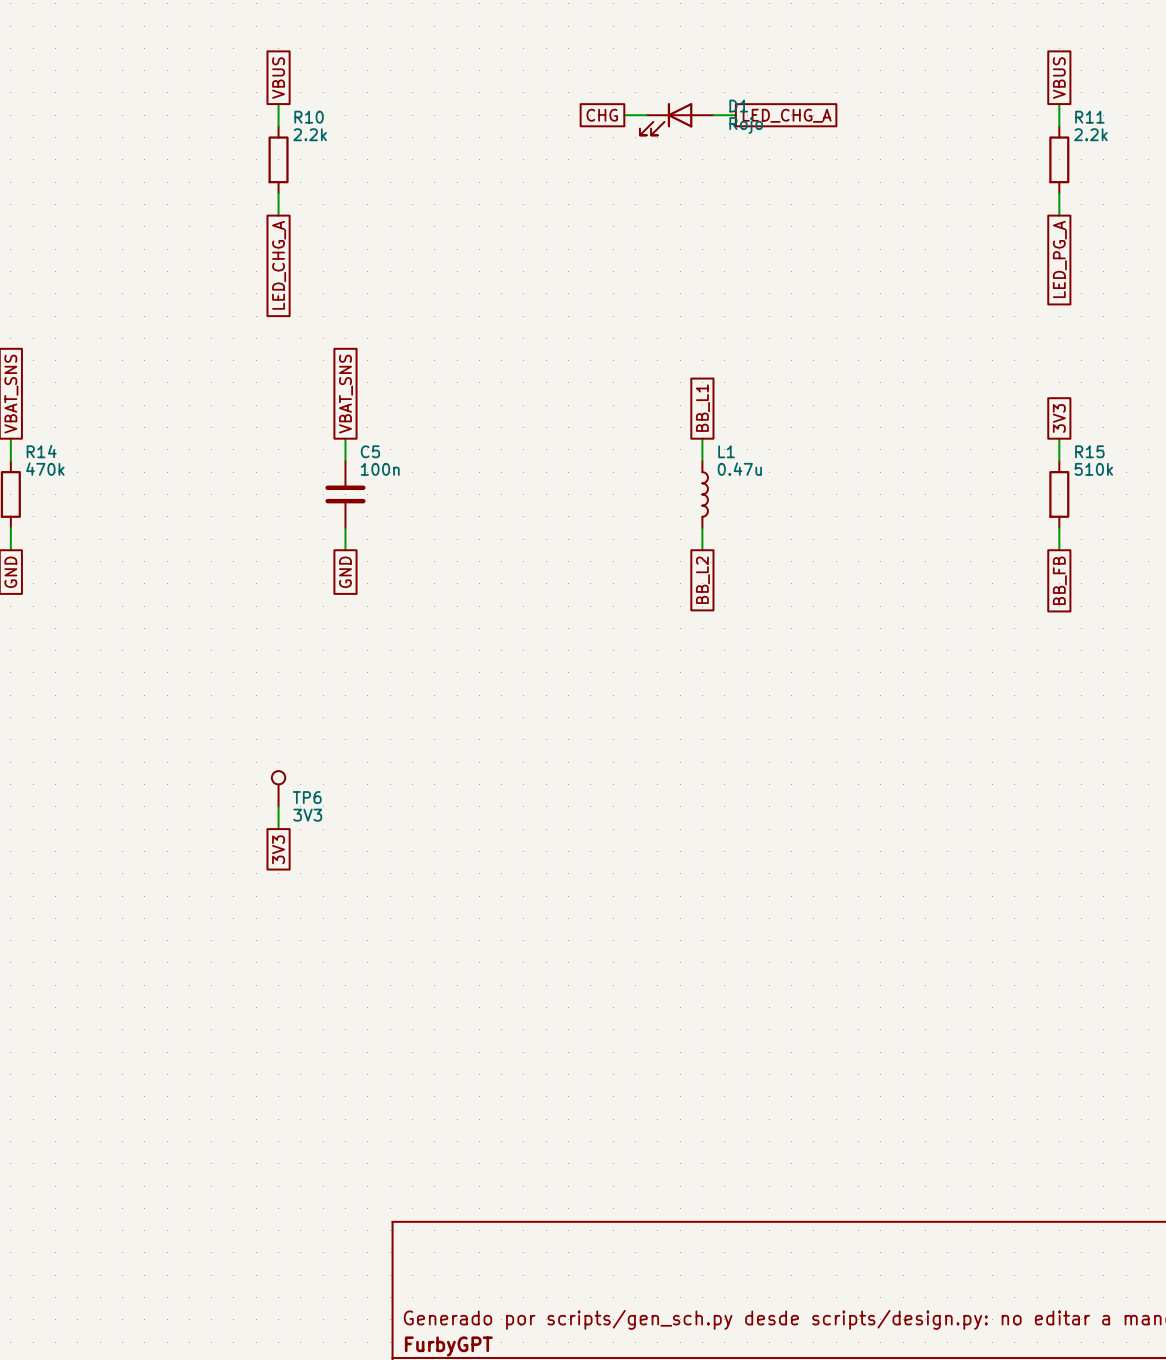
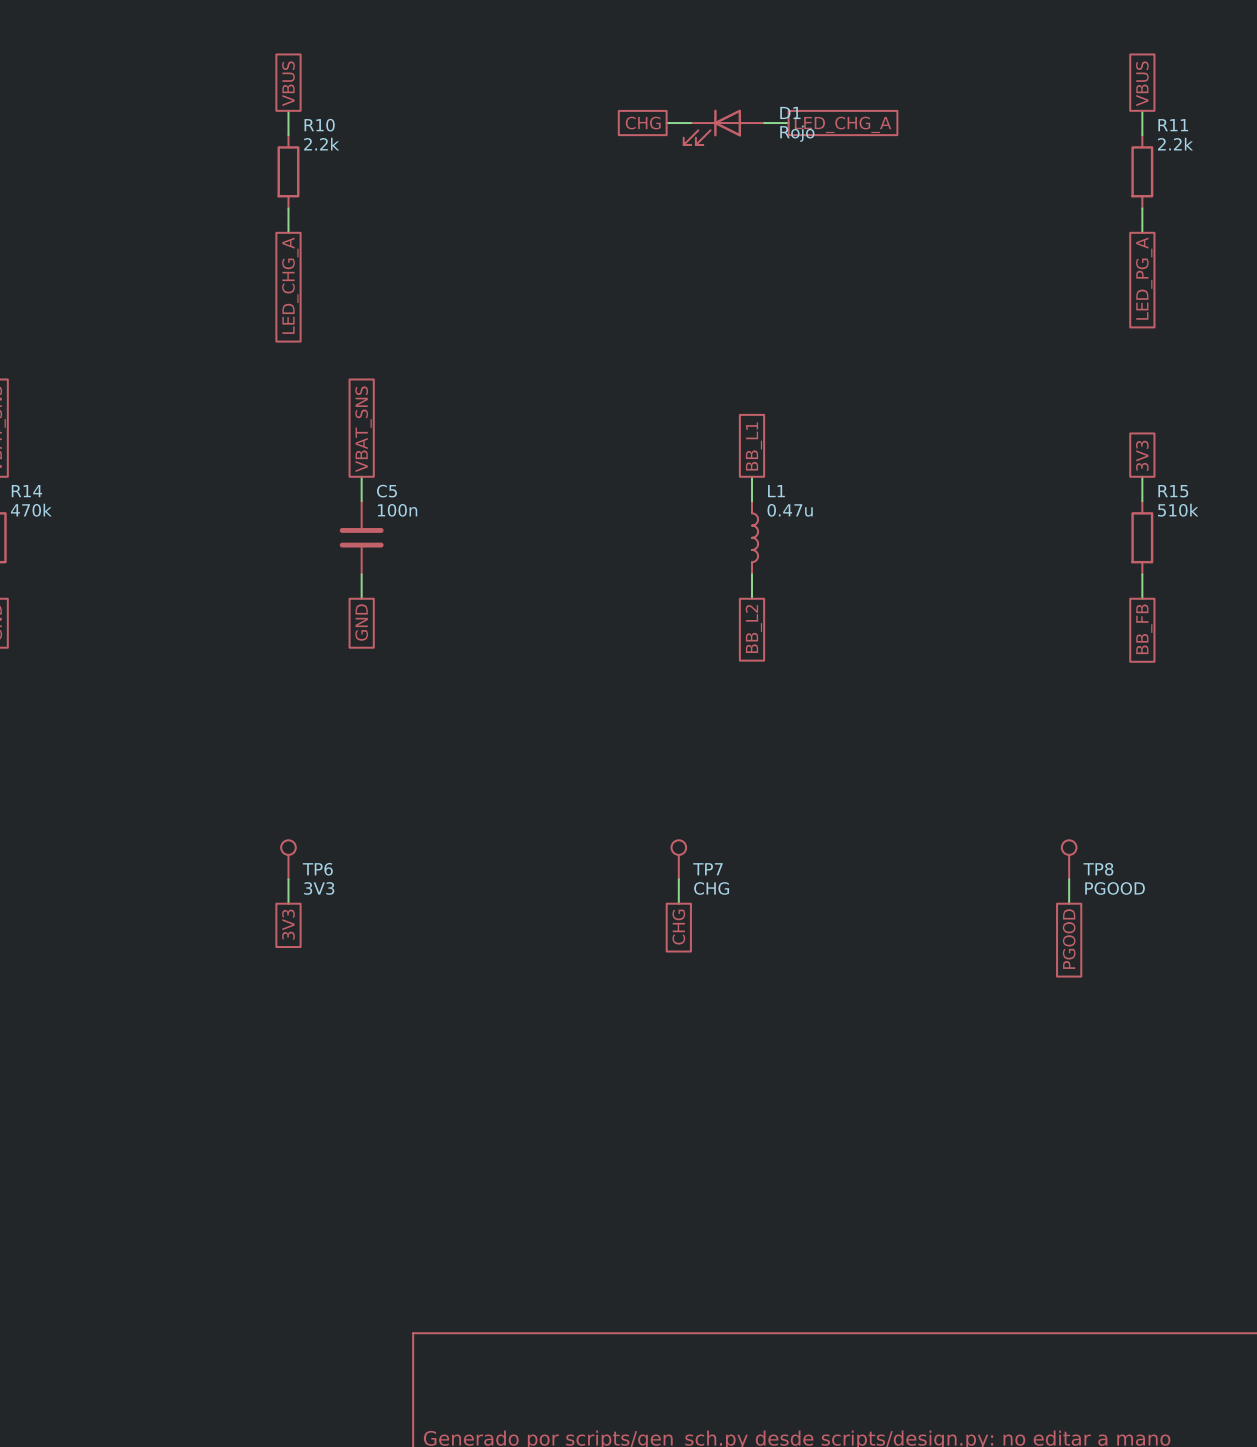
TP7: none -> CHG (678, 859)
TP8: none -> PGOOD (1069, 859)
wire: none -> (678, 879) (678, 903)
wire: none -> (1069, 879) (1069, 903)
global label: none -> CHG (678, 927)
global label: none -> PGOOD (1069, 939)

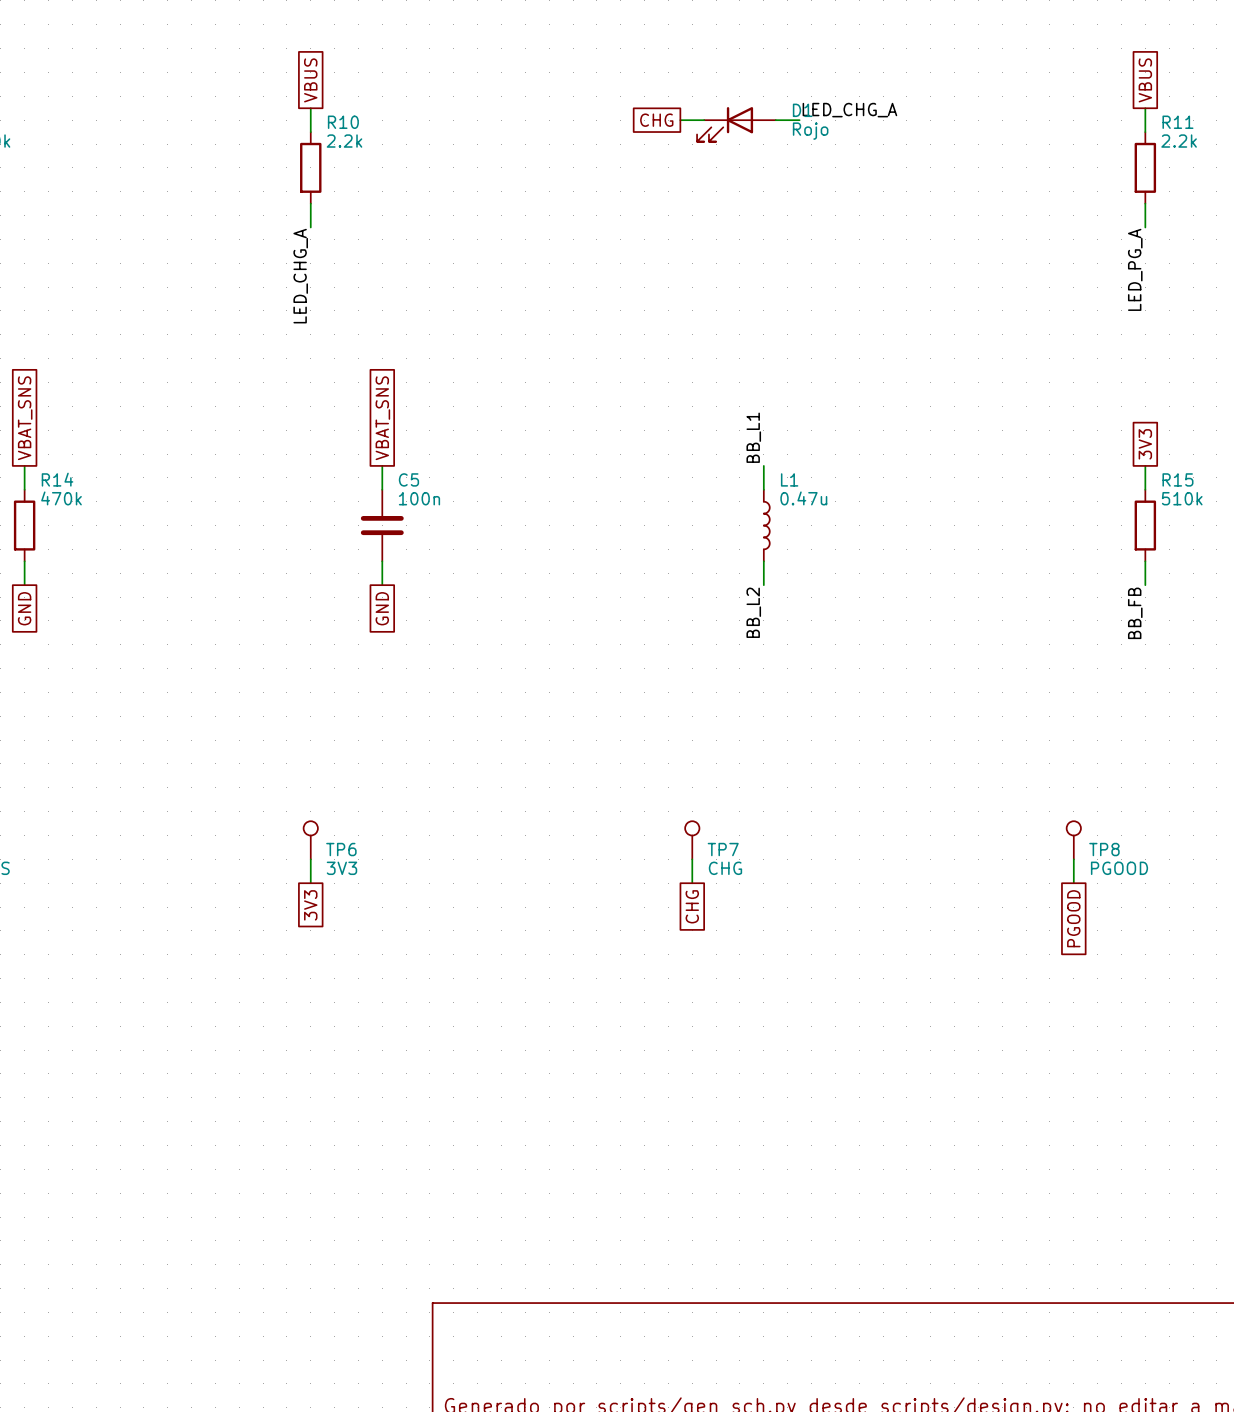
label: none -> LED_CHG_A (849, 110)
global label: LED_CHG_A (843, 124) -> none
label: none -> LED_PG_A (1135, 269)
global label: LED_PG_A (1144, 278) -> none
label: none -> LED_CHG_A (300, 276)
global label: LED_CHG_A (290, 285) -> none
global label: BB_L1 (753, 446) -> none
label: none -> BB_L1 (753, 437)
label: none -> BB_L2 (753, 612)
label: none -> BB_FB (1135, 613)
global label: BB_L2 (753, 628) -> none
global label: BB_FB (1144, 629) -> none

